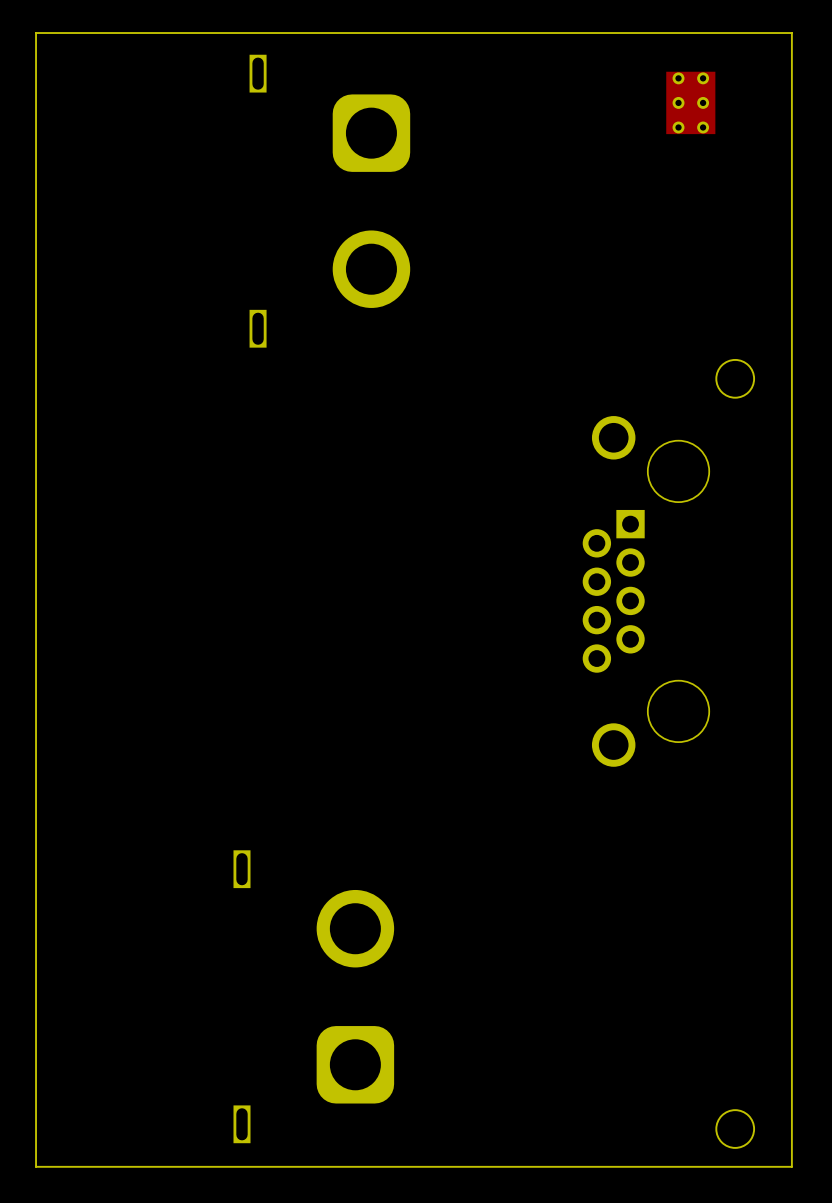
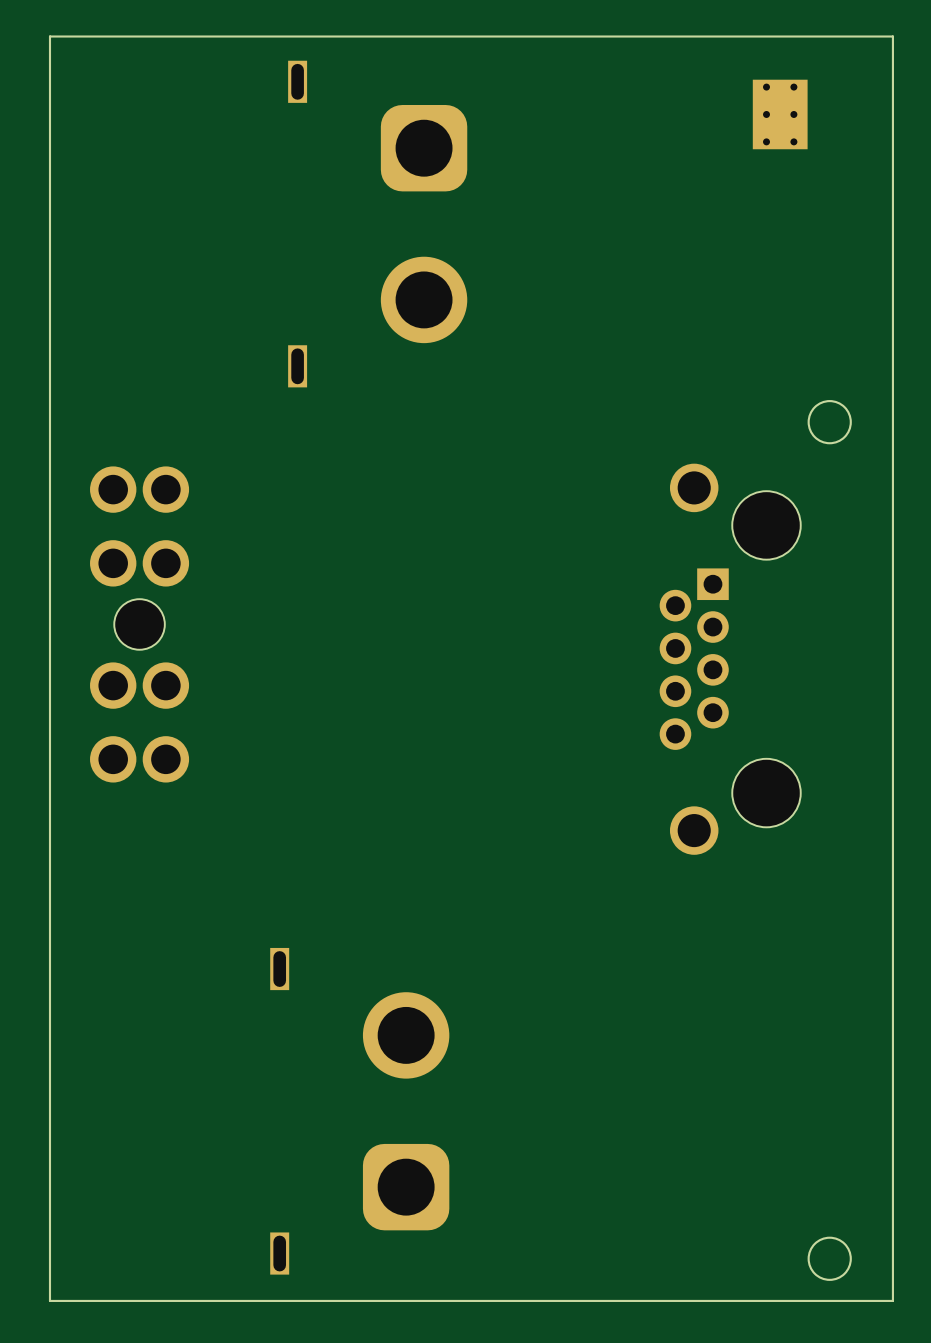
part: none -> (139, 624)

